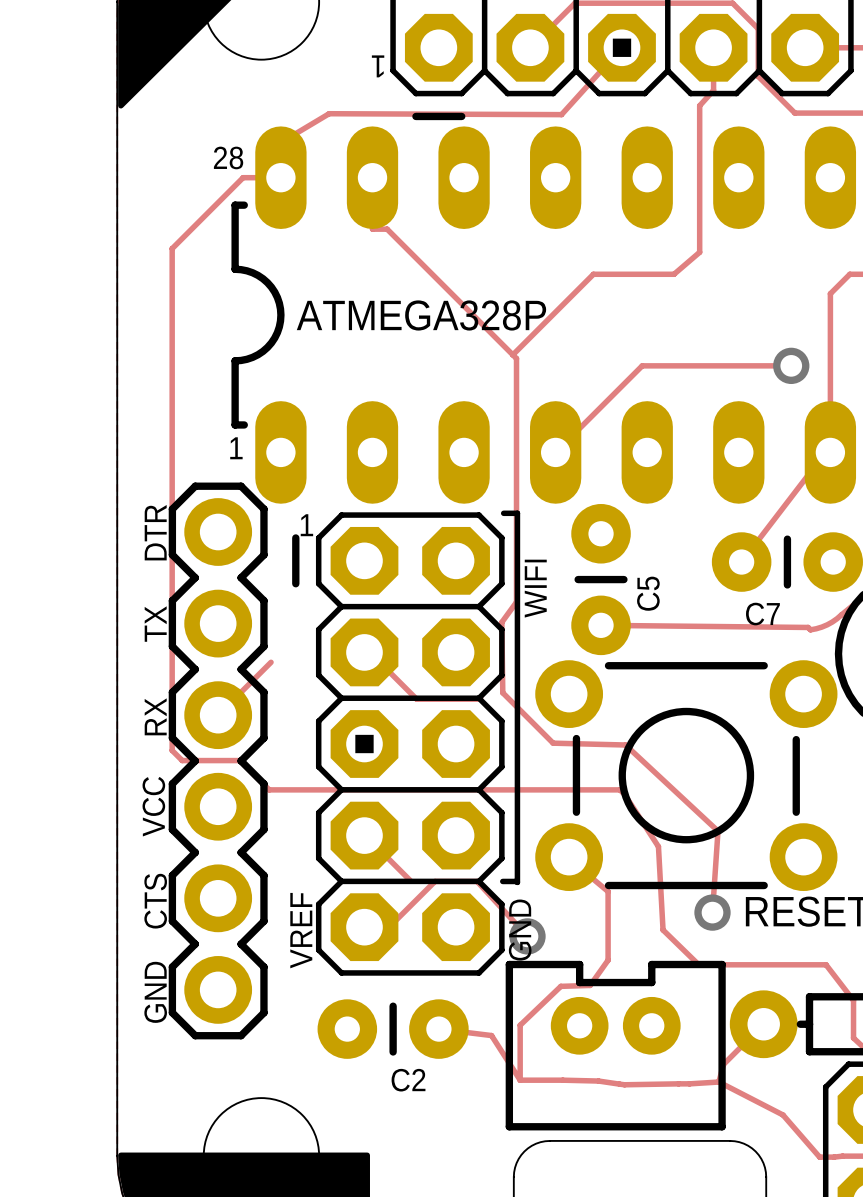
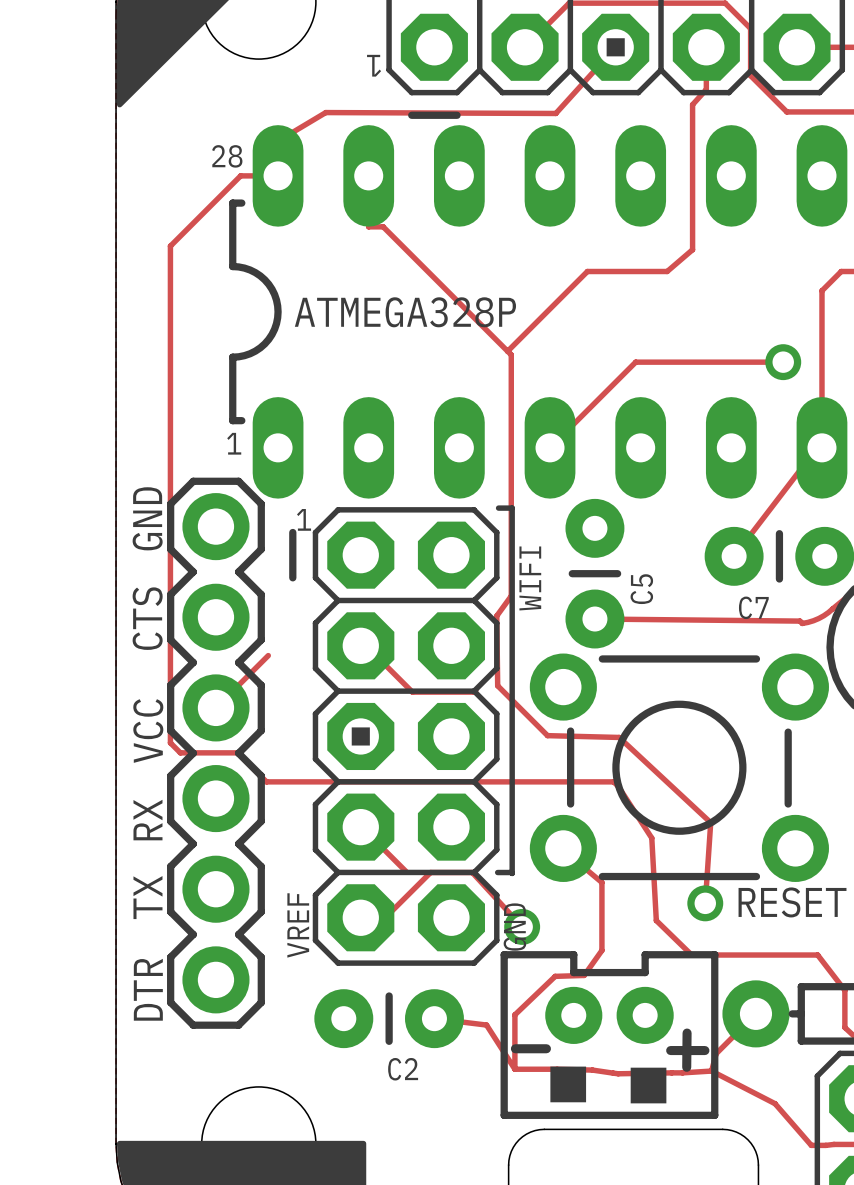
text: DTR (155, 532) -> GND (147, 518)
text: TX (155, 624) -> CTS (147, 618)
text: RX (155, 716) -> none
text: none -> VCC (148, 731)
text: VCC (153, 806) -> RX (147, 820)
text: CTS (155, 901) -> TX (147, 897)
text: GND (155, 992) -> DTR (148, 989)
line: none -> (687, 1033) (686, 1067)
line: none -> (515, 1048) (546, 1048)
line: none -> (670, 1050) (704, 1050)
drawing: none -> [550, 1066, 587, 1103]
drawing: none -> [630, 1067, 667, 1104]

